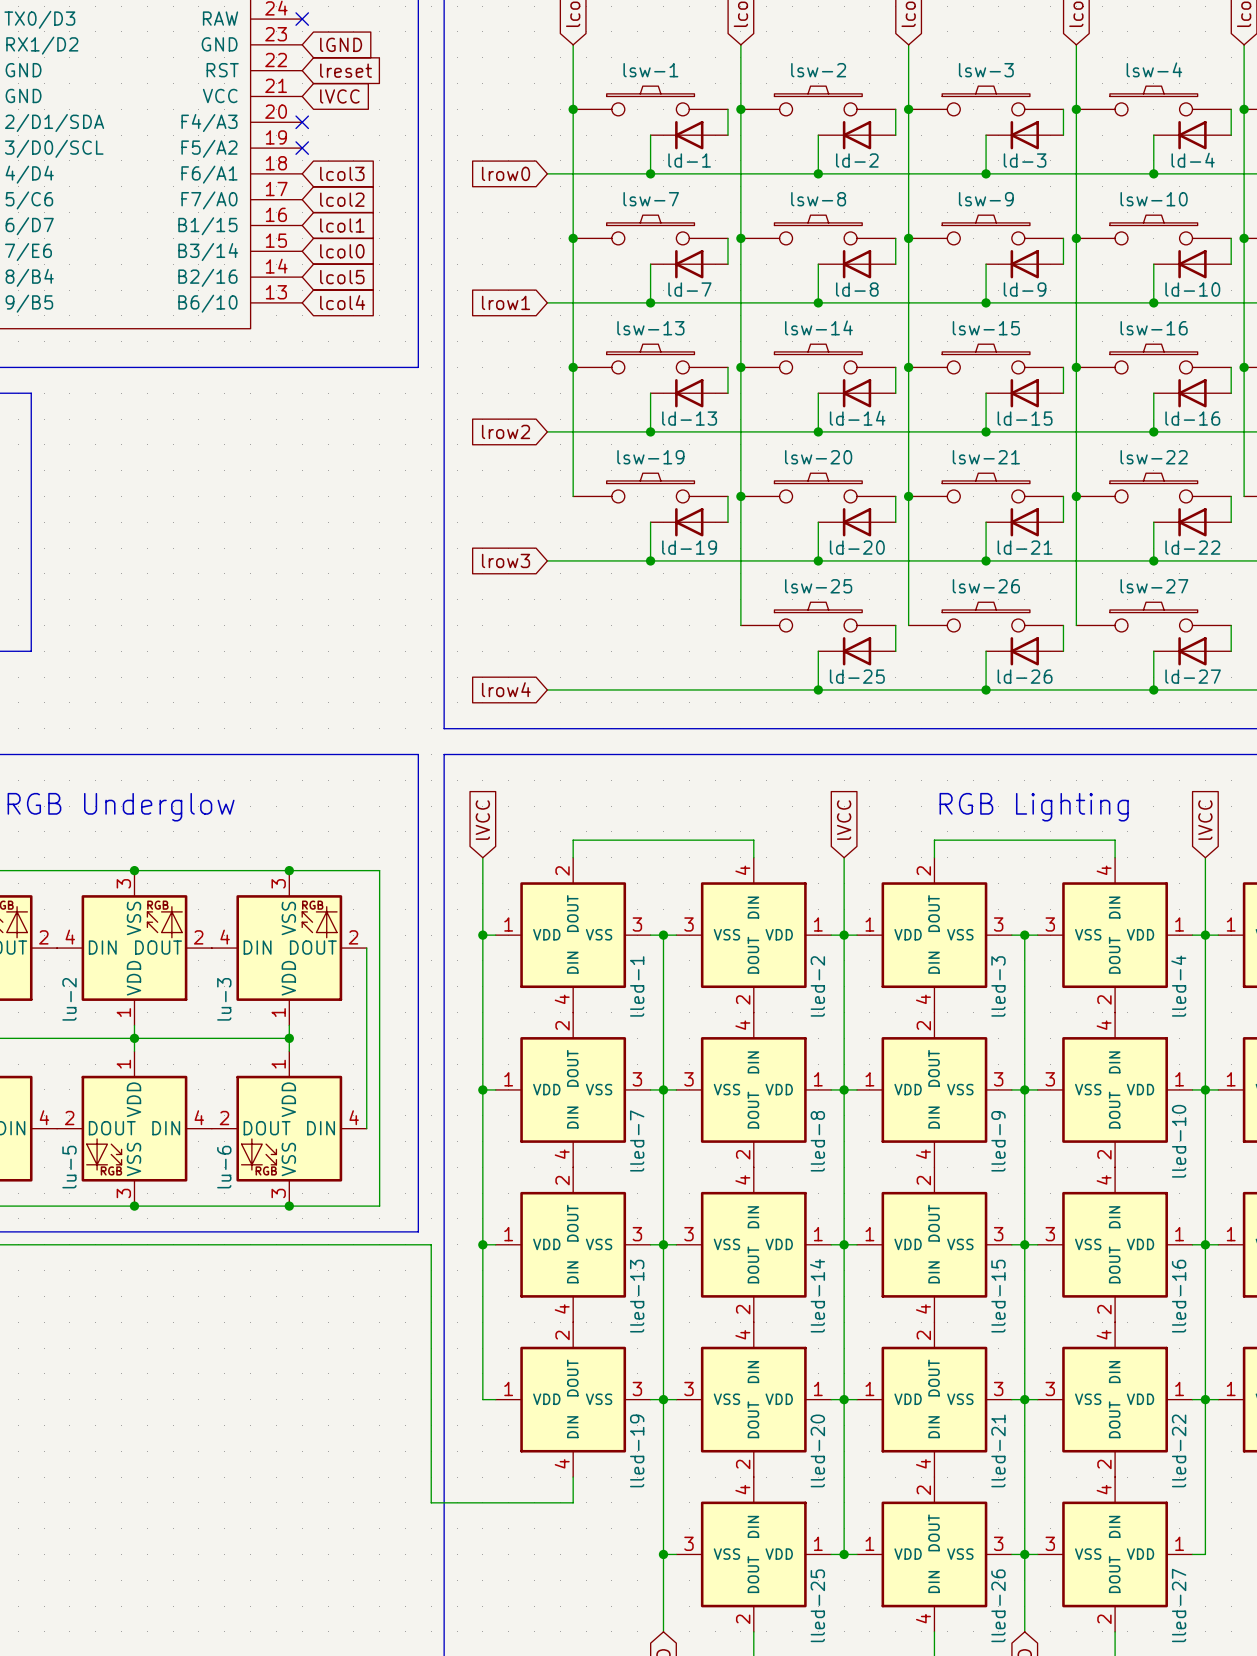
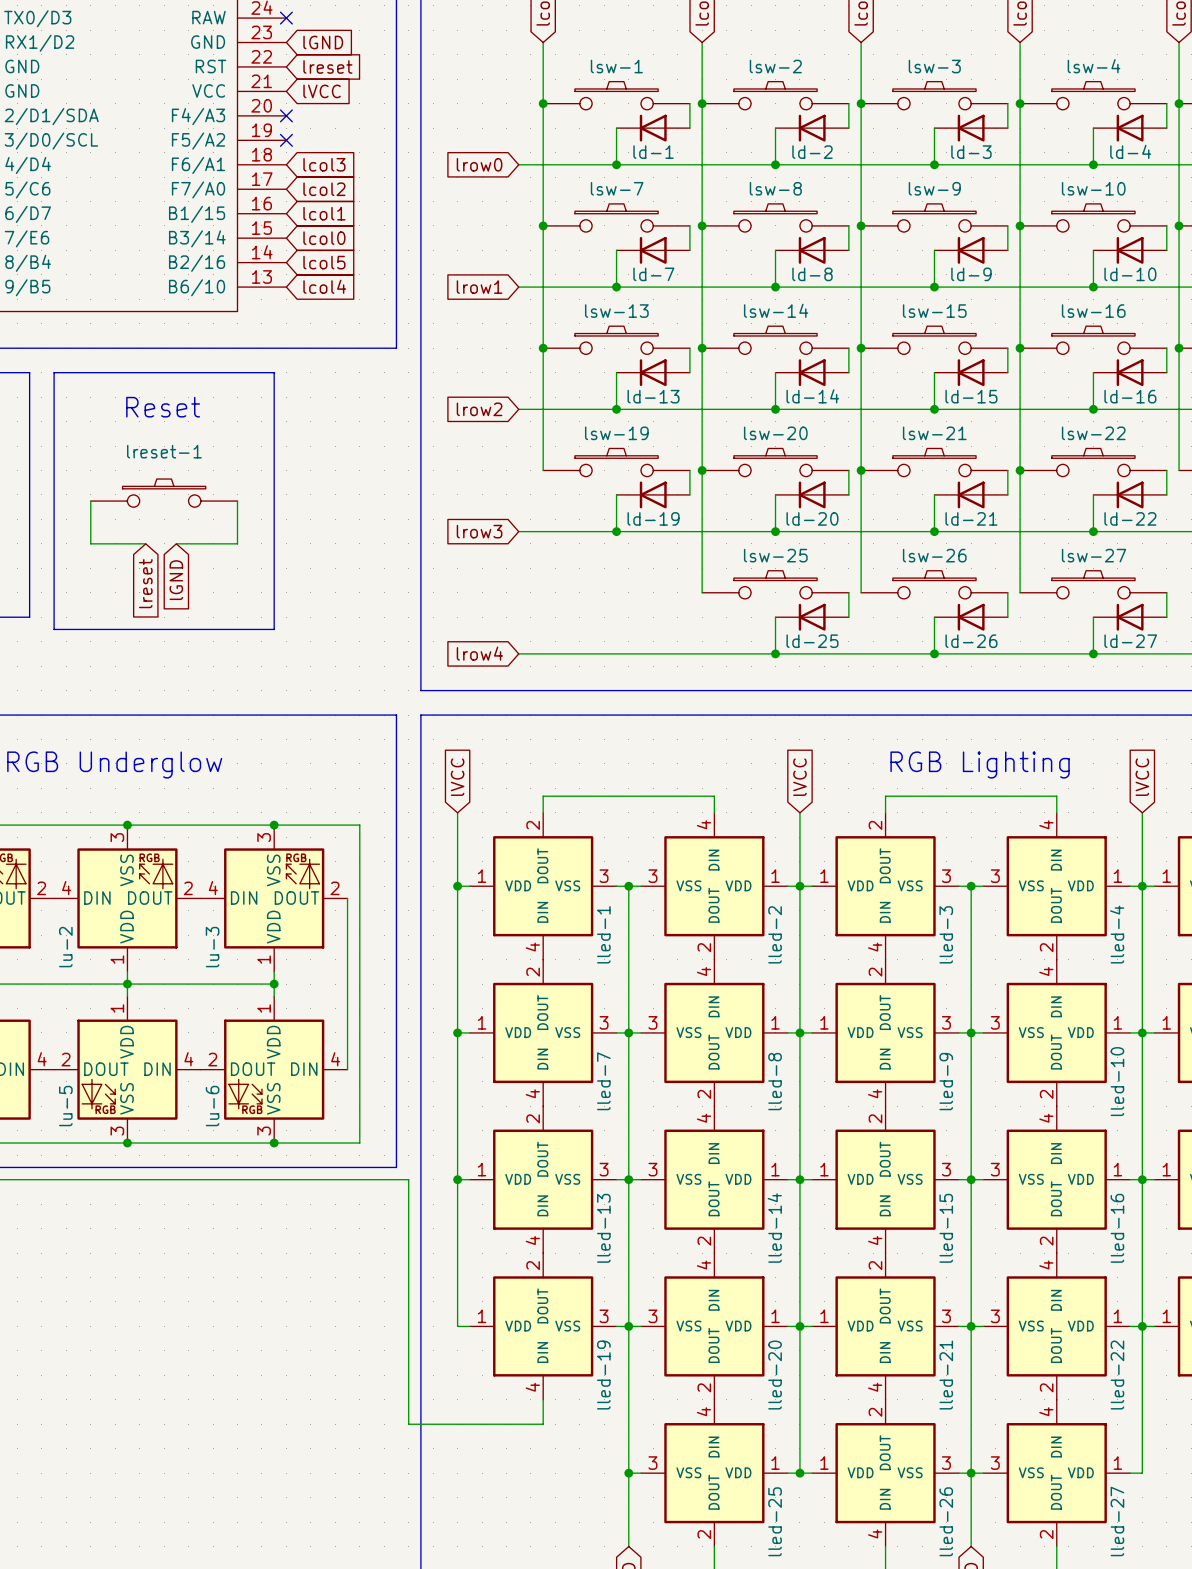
line: none -> (54, 372) (274, 372) (274, 629) (54, 629) (54, 372)
text: none -> Reset (163, 407)
lreset-1: none -> (164, 493)
wire: none -> (90, 501) (90, 543) (145, 543)
wire: none -> (237, 501) (237, 543) (176, 543)
global label: none -> lGND (176, 580)
global label: none -> lreset (145, 583)

